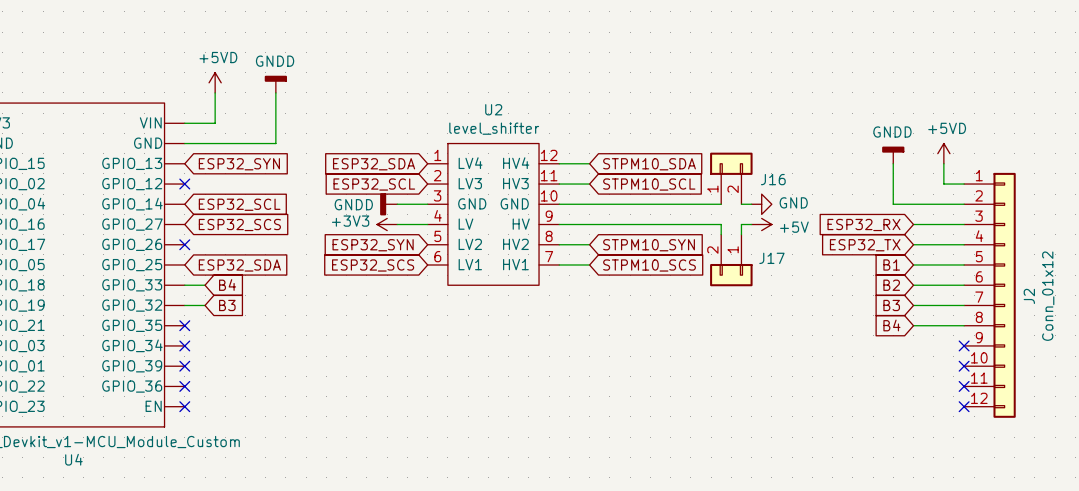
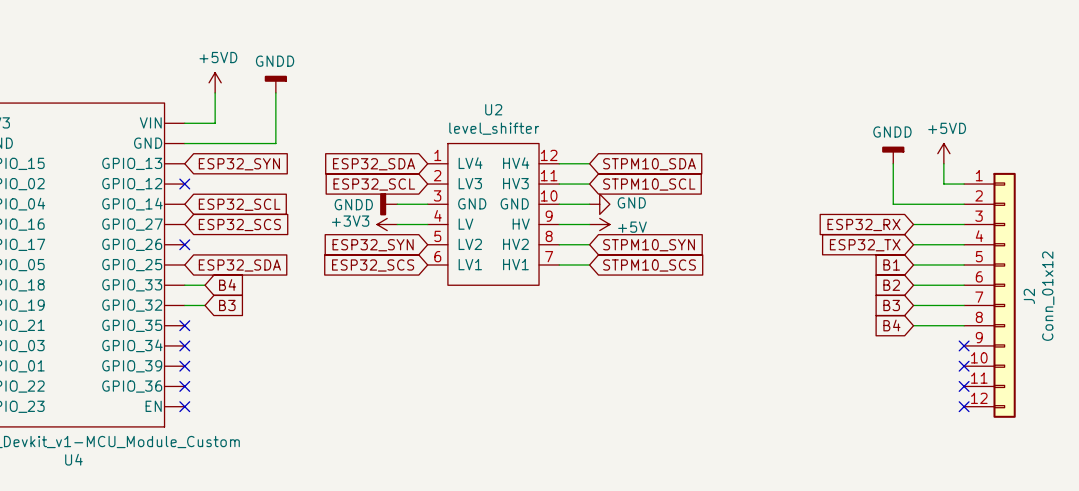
J16: (731, 178) -> none
wire: (589, 204) (721, 204) -> none
wire: (741, 204) (751, 204) -> none
power symbol position: GND (761, 204) -> GND (599, 204)
wire: (589, 224) (721, 224) (721, 234) -> none
wire: (751, 224) (741, 224) (741, 234) -> none
power symbol position: +5V (761, 224) -> +5V (599, 224)
J17: (731, 260) -> none

